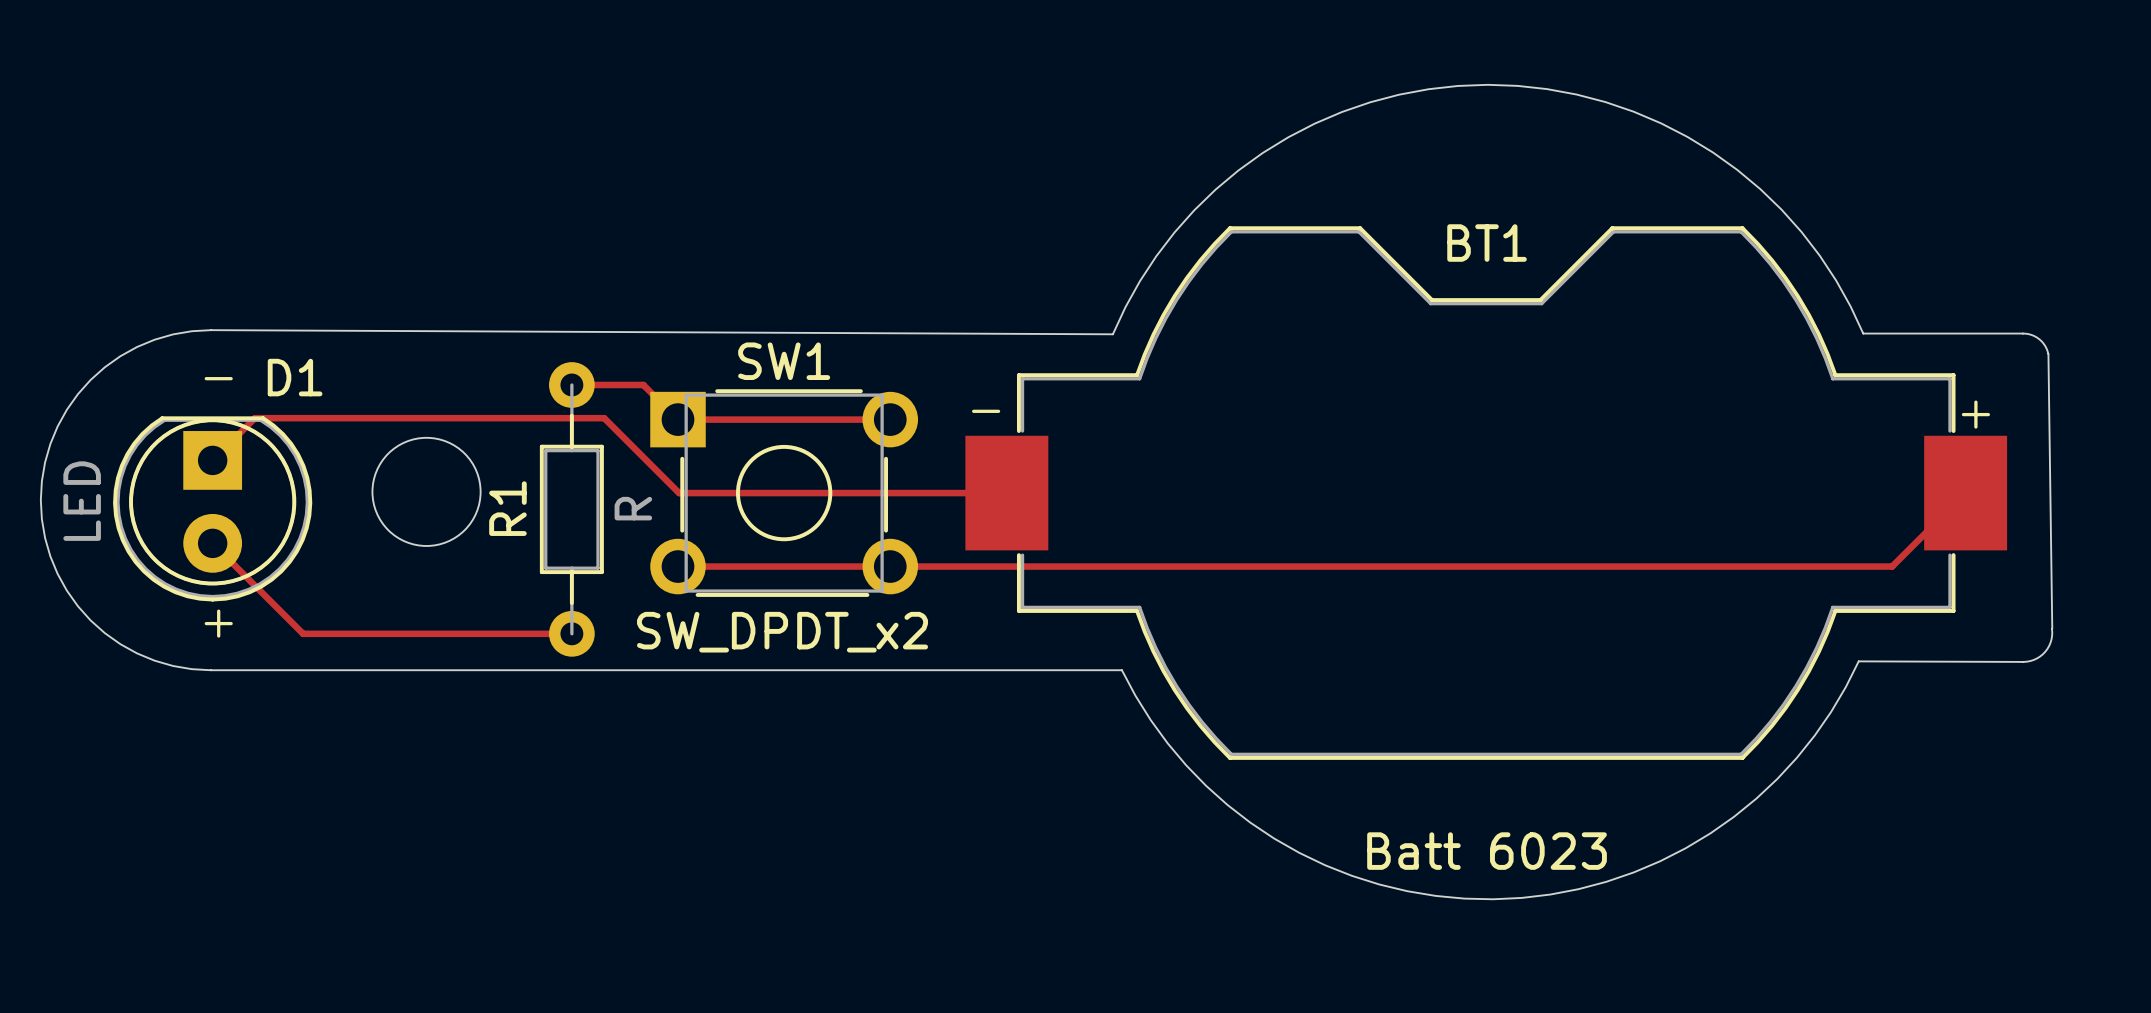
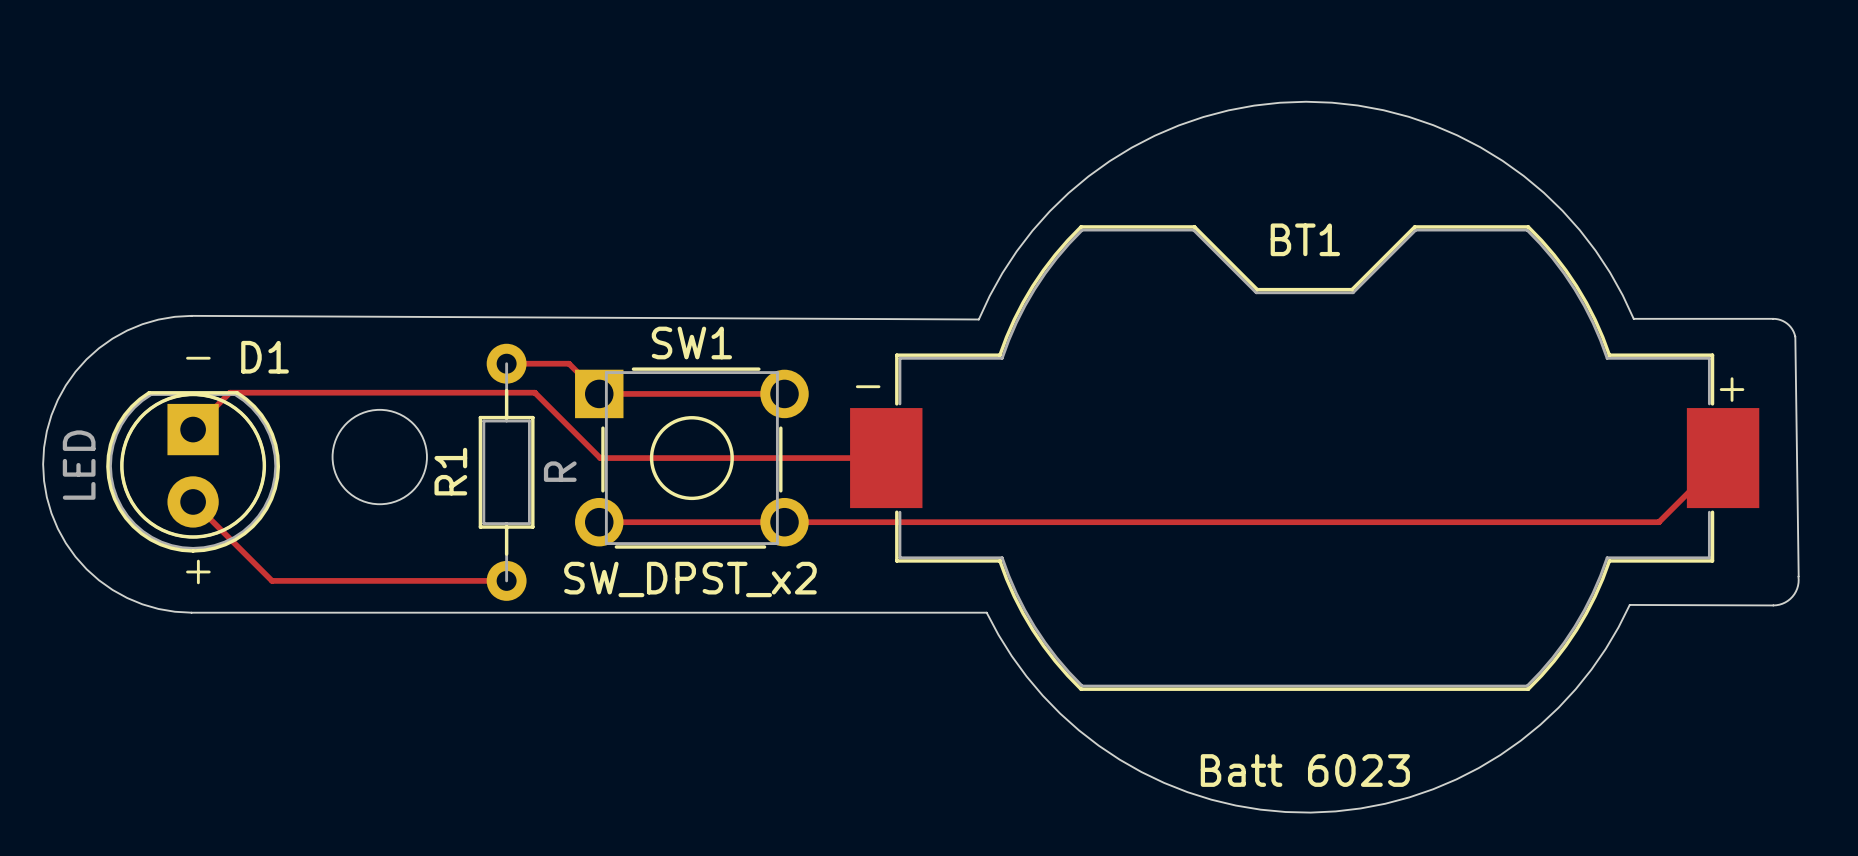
SW1 value: SW_DPDT_x2 (782, 632) -> SW_DPST_x2 (690, 579)

